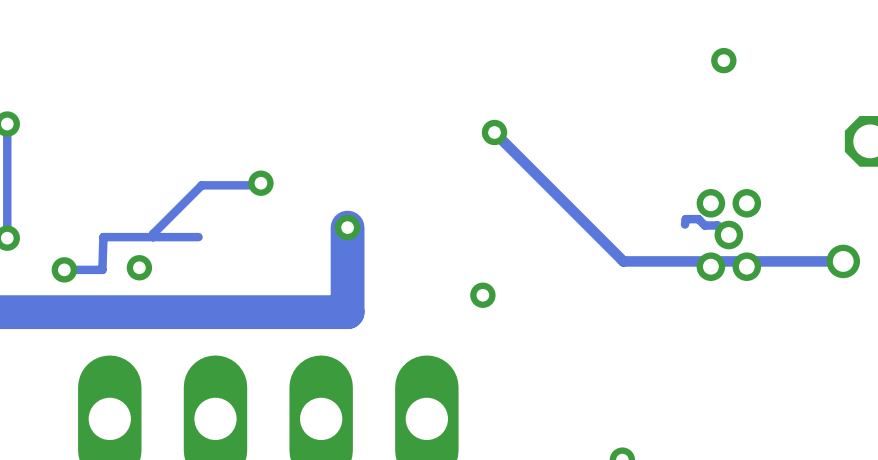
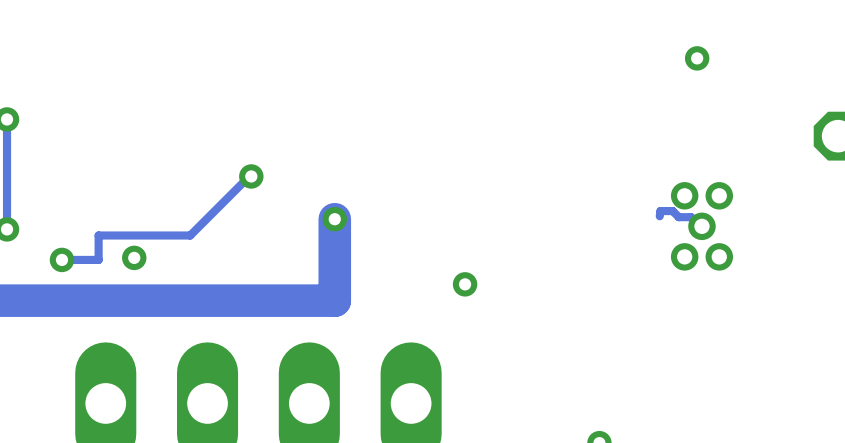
track: (494, 132) (623, 261) (843, 261) -> none
via: (494, 132) -> none
track: (260, 183) (258, 185) (201, 185) (153, 233) (153, 237) -> none
track: (198, 237) (103, 237) (102, 269) -> (251, 174) (190, 235) (98, 235) (98, 259)
via: (843, 261) -> none

